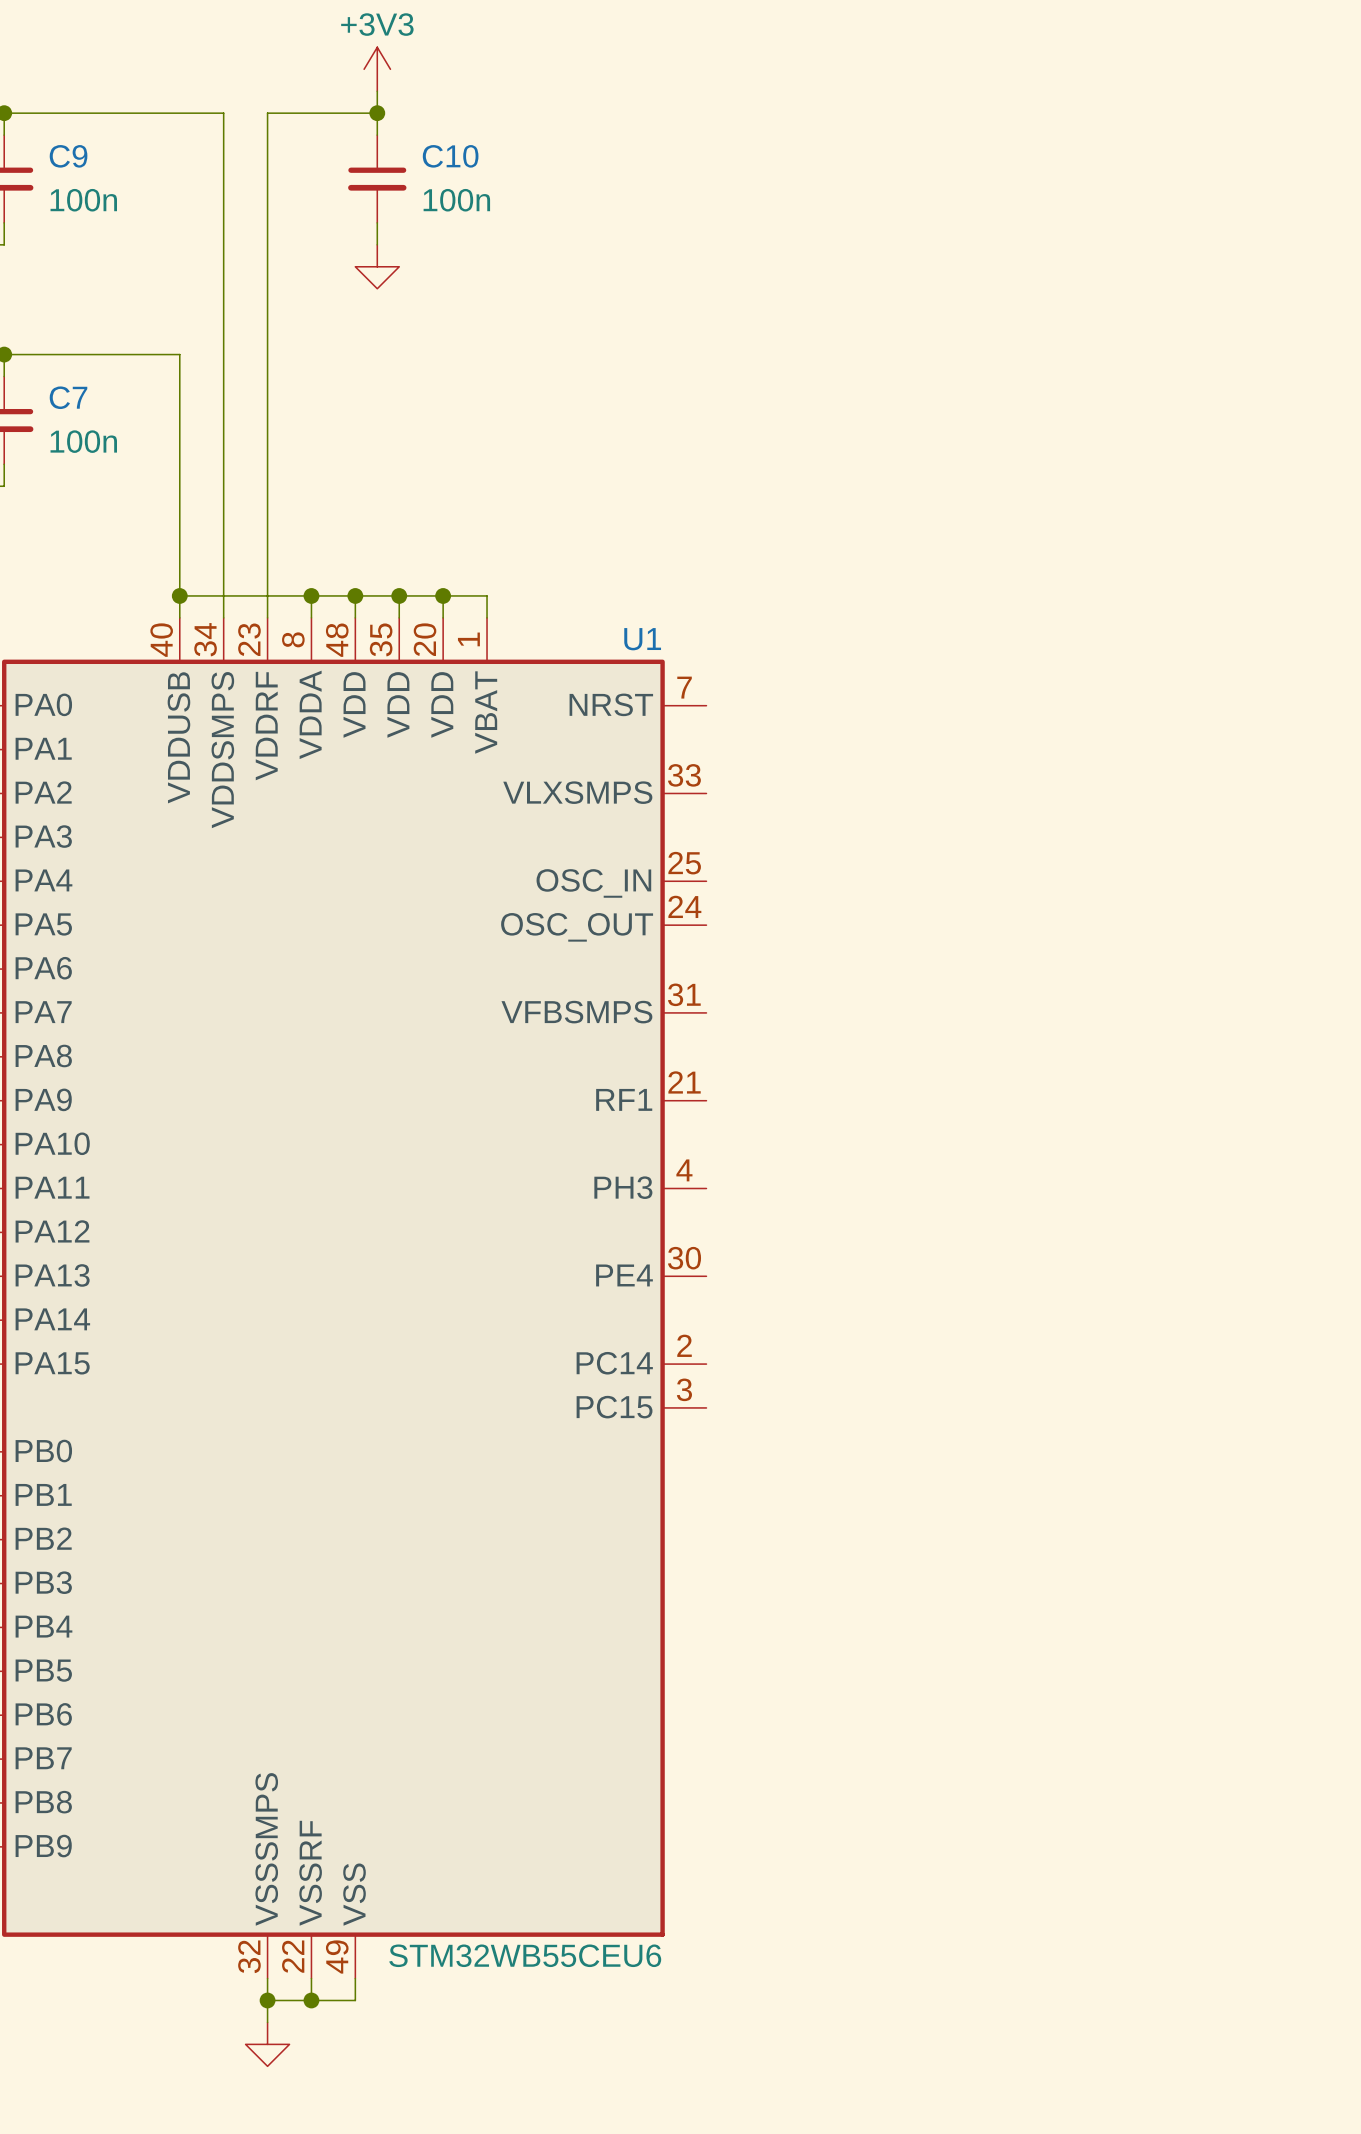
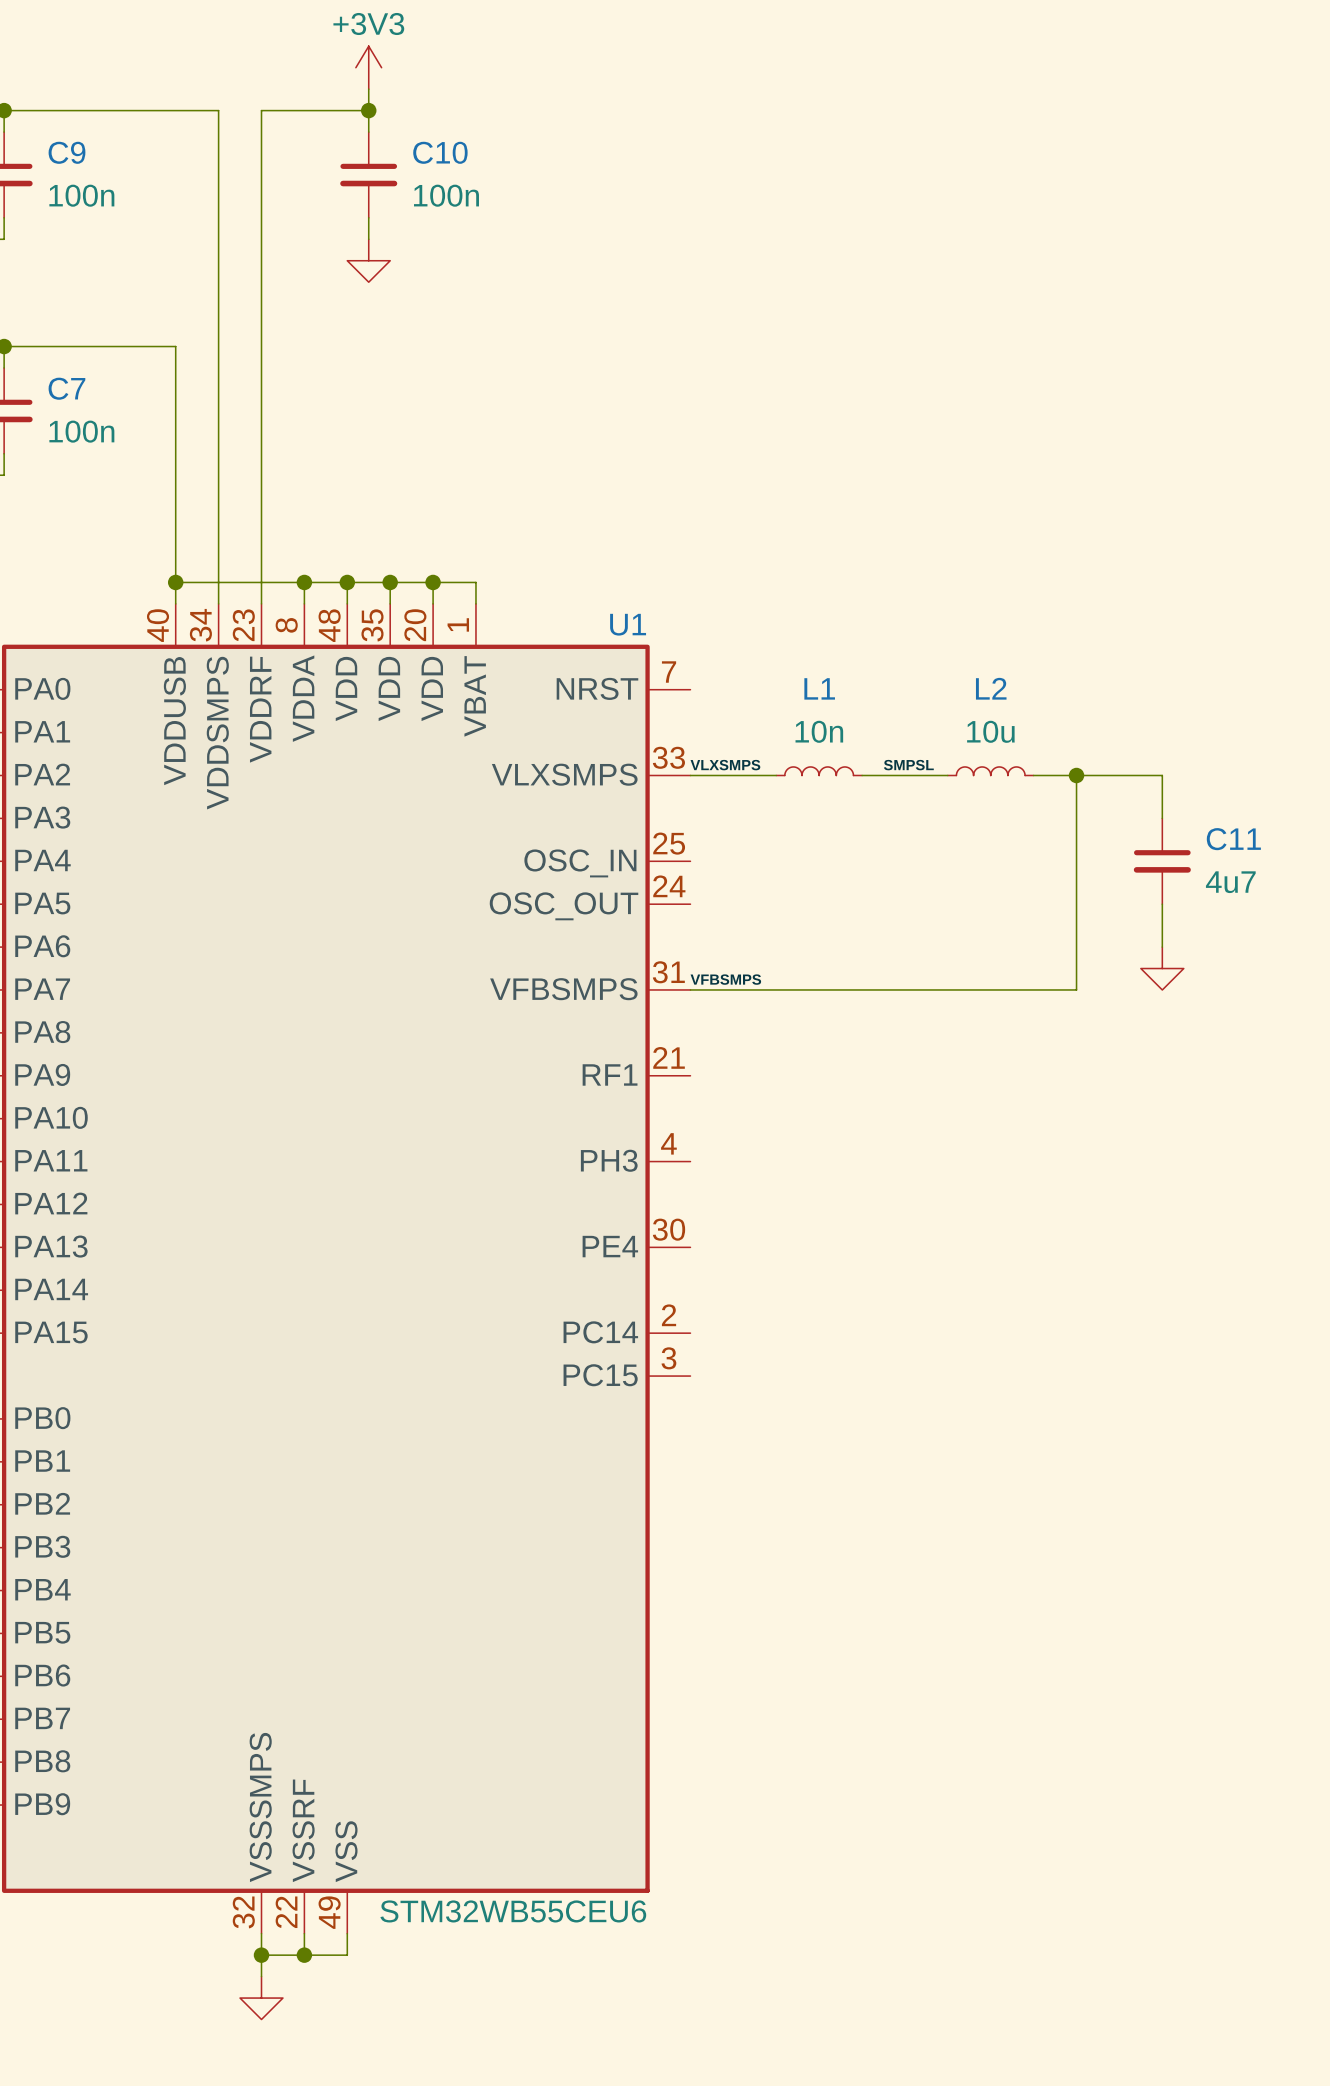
label: none -> VLXSMPS (725, 765)
label: none -> SMPSL (908, 765)
L1: none -> 10n (819, 771)
L2: none -> 10u (990, 771)
wire: none -> (690, 775) (776, 775)
wire: none -> (862, 775) (947, 775)
wire: none -> (1033, 775) (1162, 775) (1162, 818)
wire: none -> (1076, 775) (1076, 989) (690, 989)
junction: none -> (1076, 775)
C11: none -> 4u7 (1162, 861)
wire: none -> (1162, 904) (1162, 947)
power symbol: none -> (1162, 968)
label: none -> VFBSMPS (725, 979)

